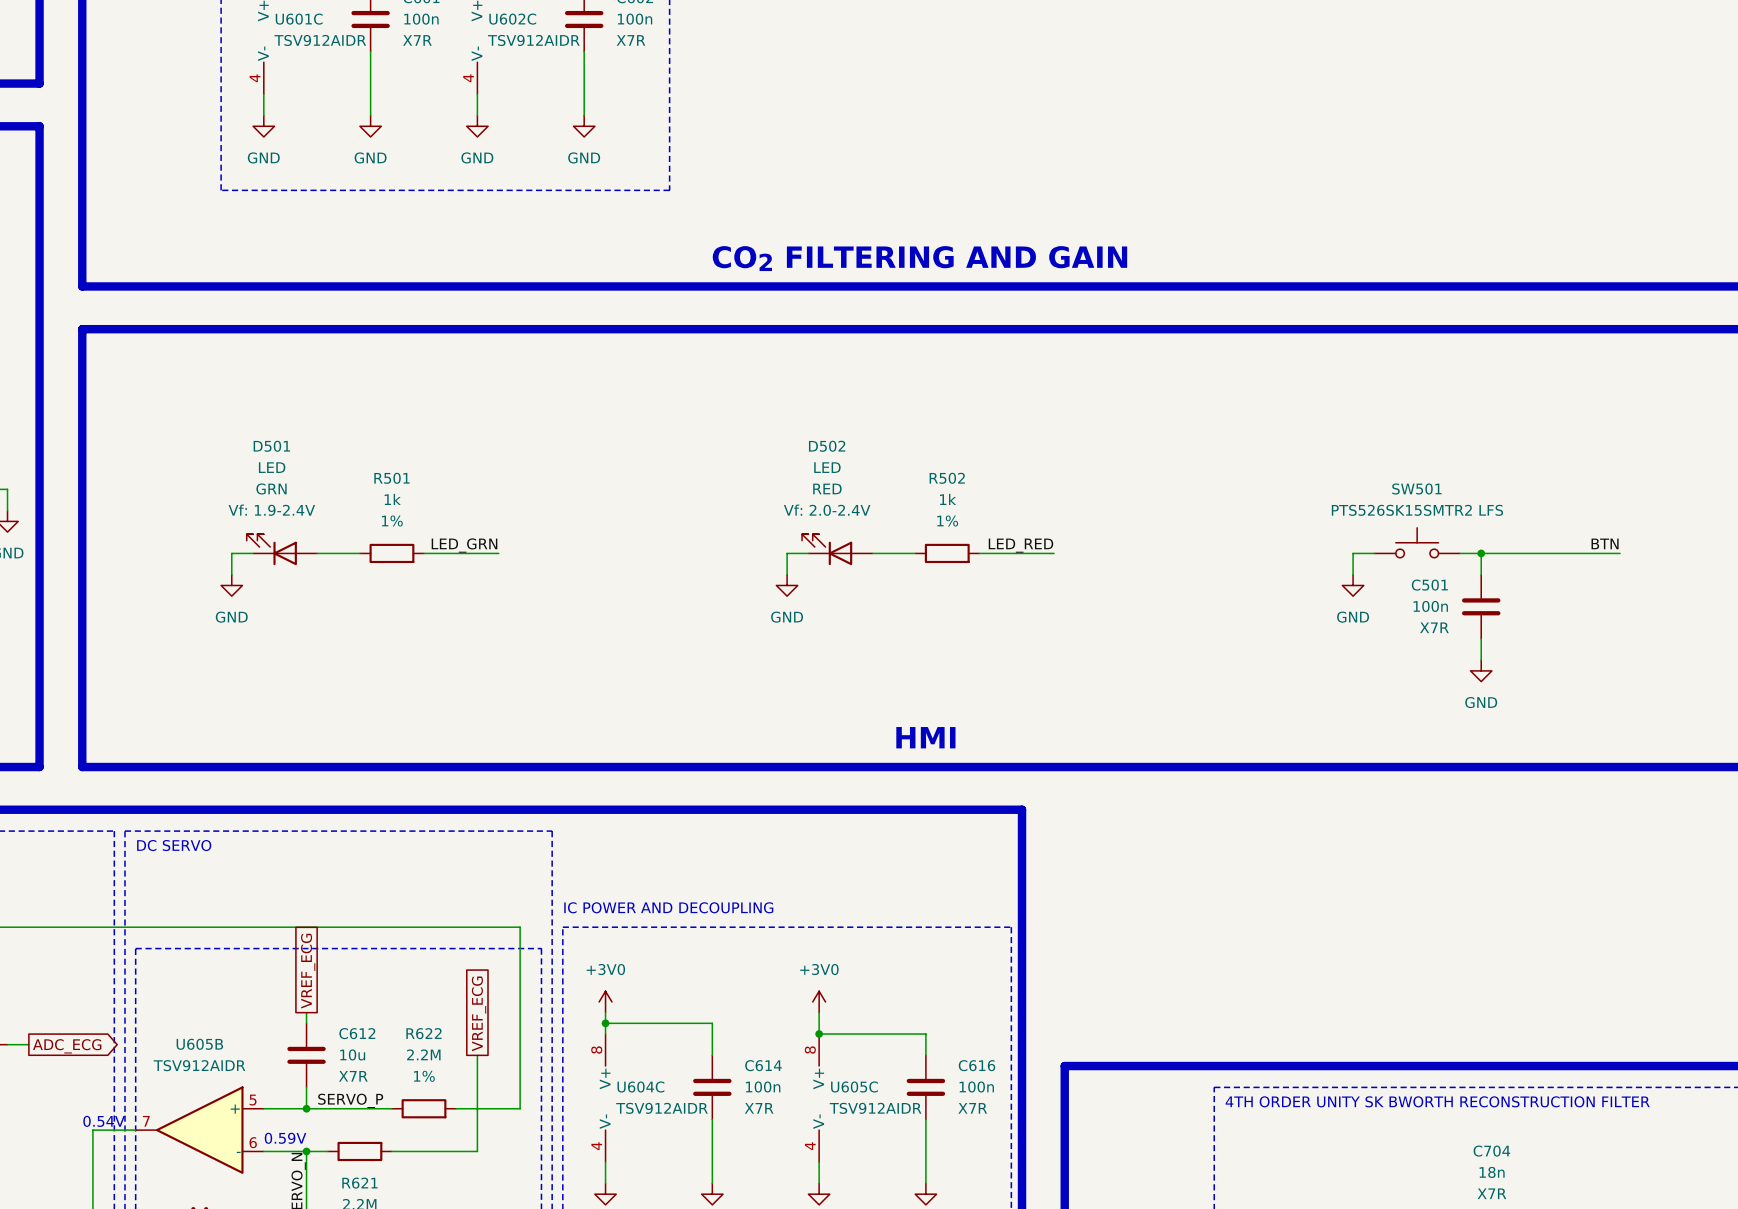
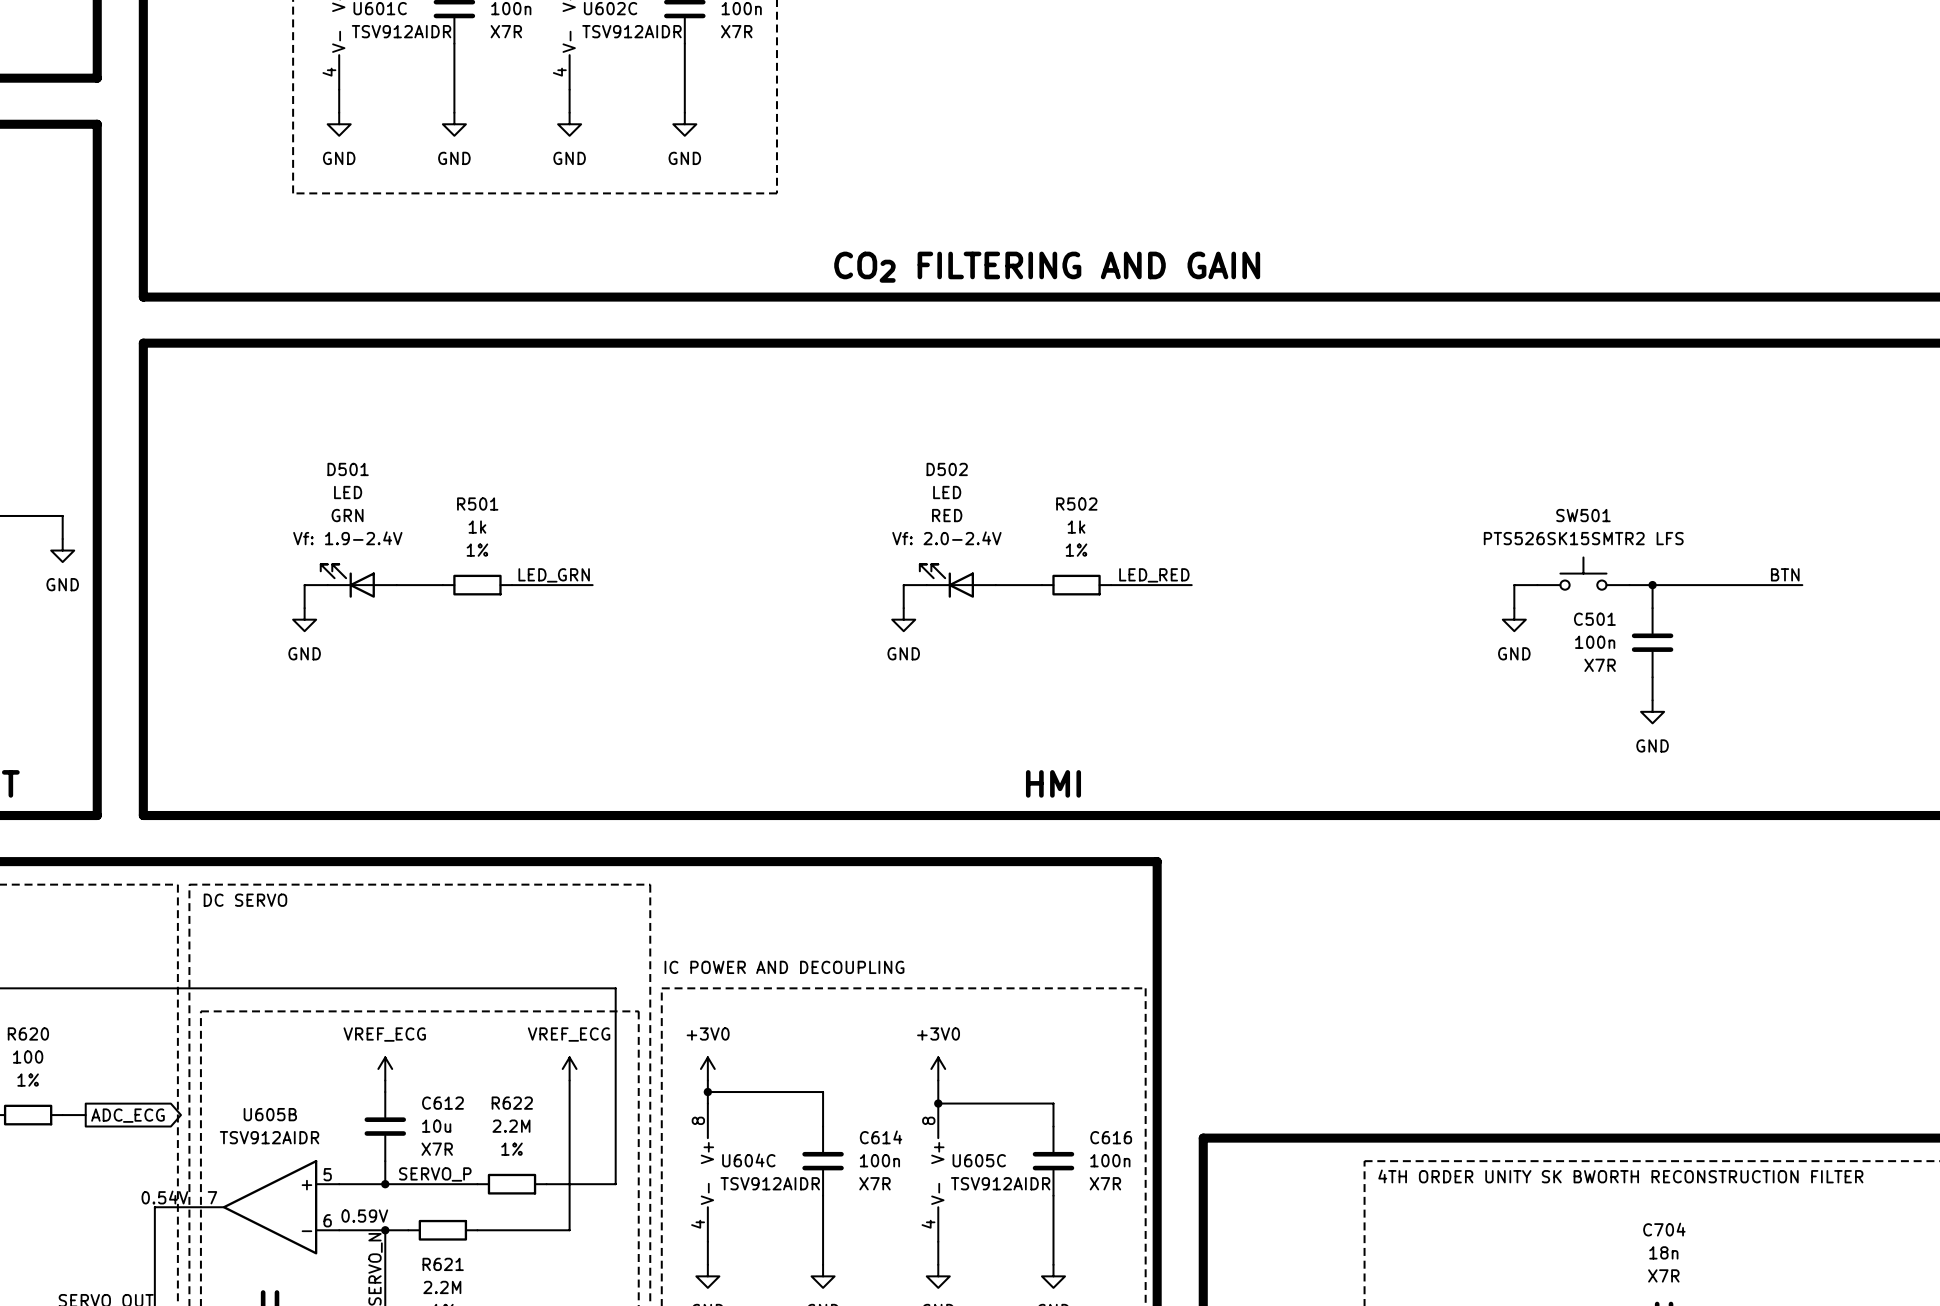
global label: VREF_ECG (308, 971) -> none
power symbol: none -> VREF_ECG (385, 1068)
power symbol: none -> VREF_ECG (569, 1068)
wire: none -> (569, 1080) (569, 1126)
global label: VREF_ECG (479, 1013) -> none

